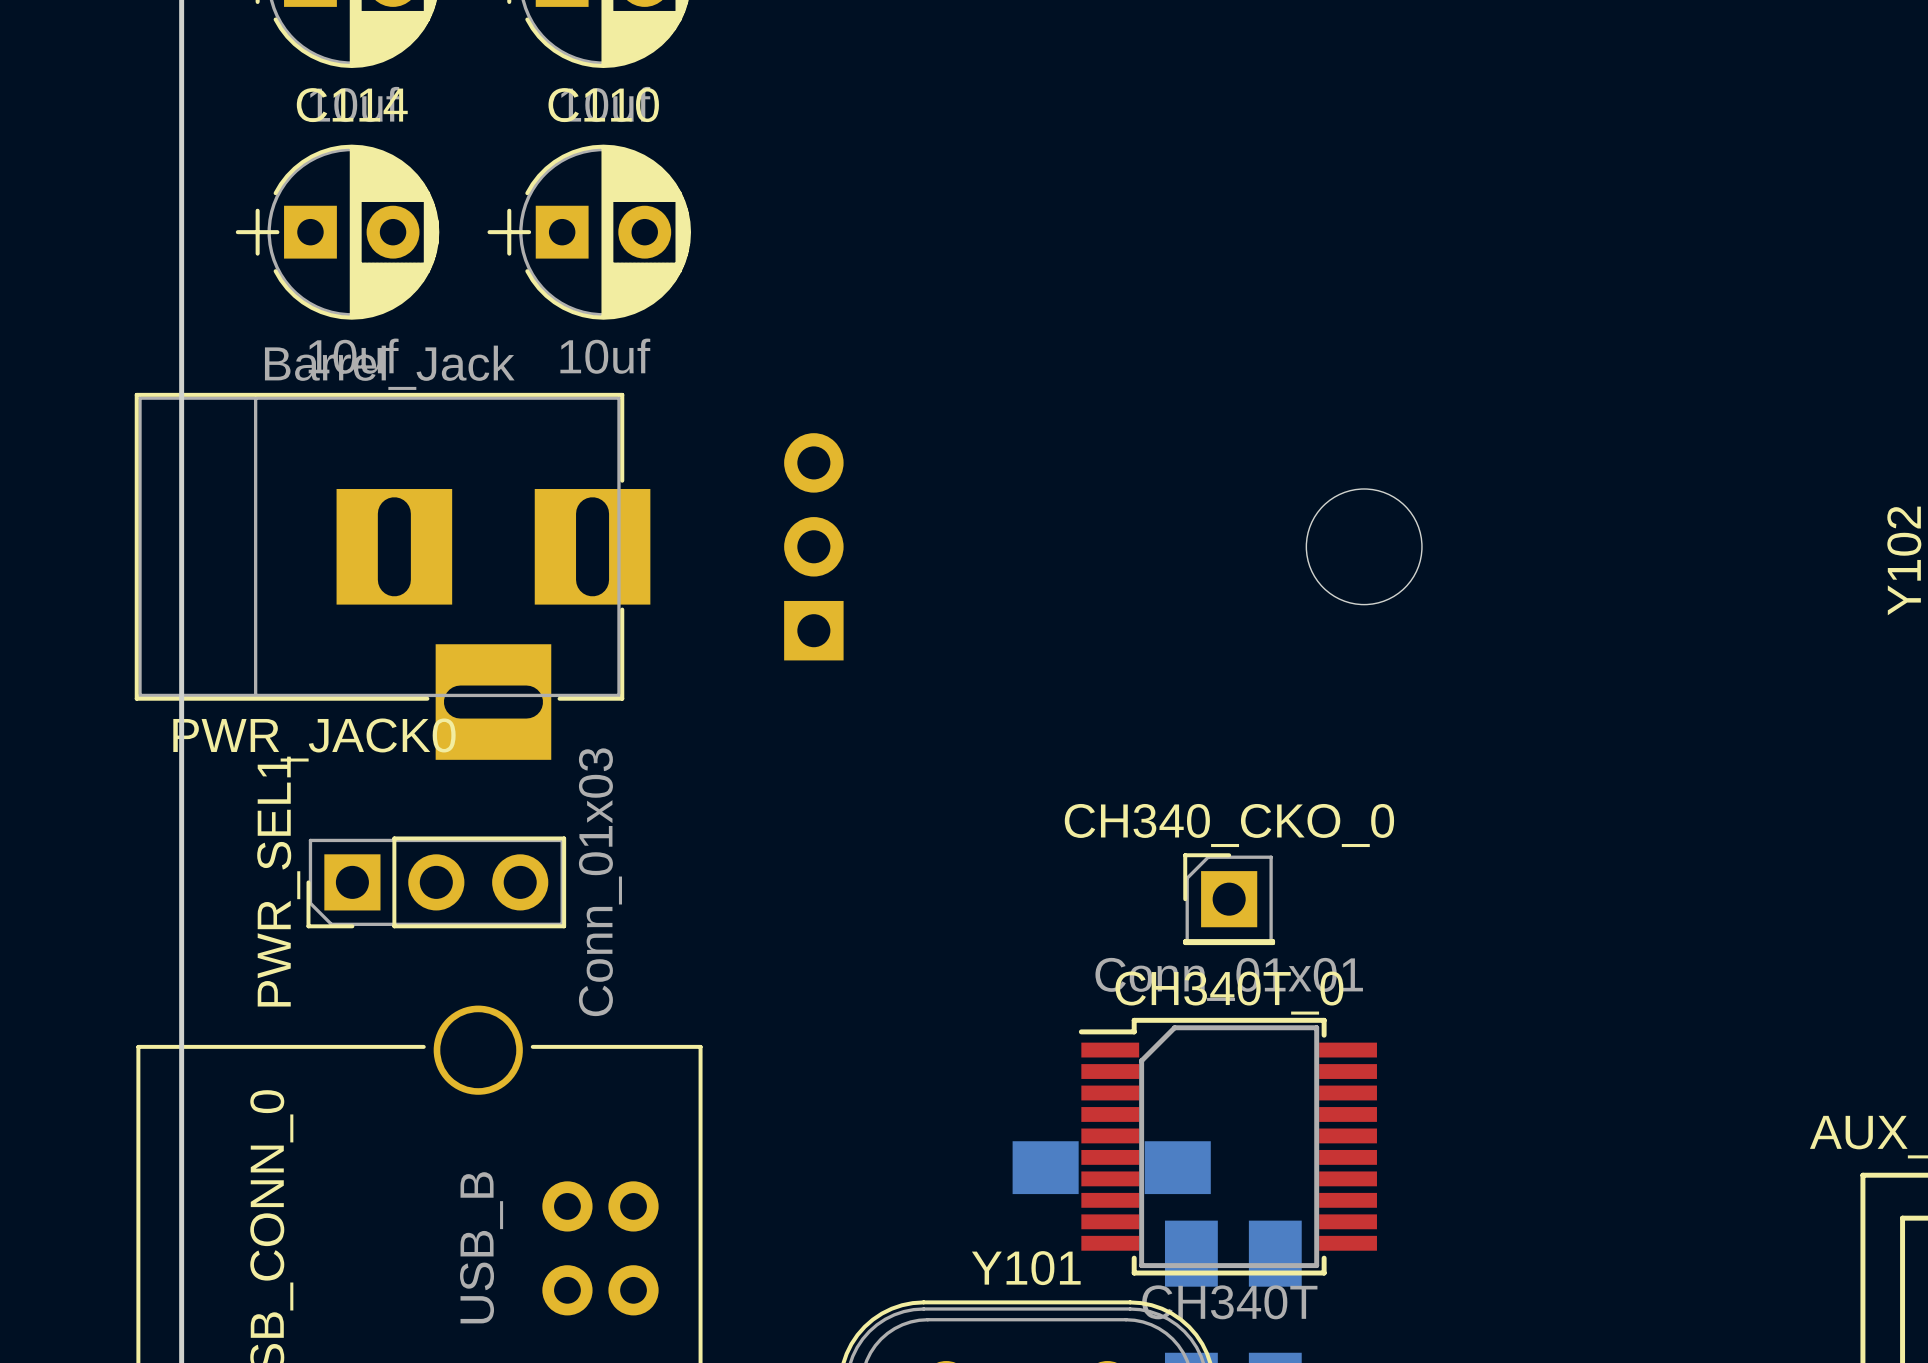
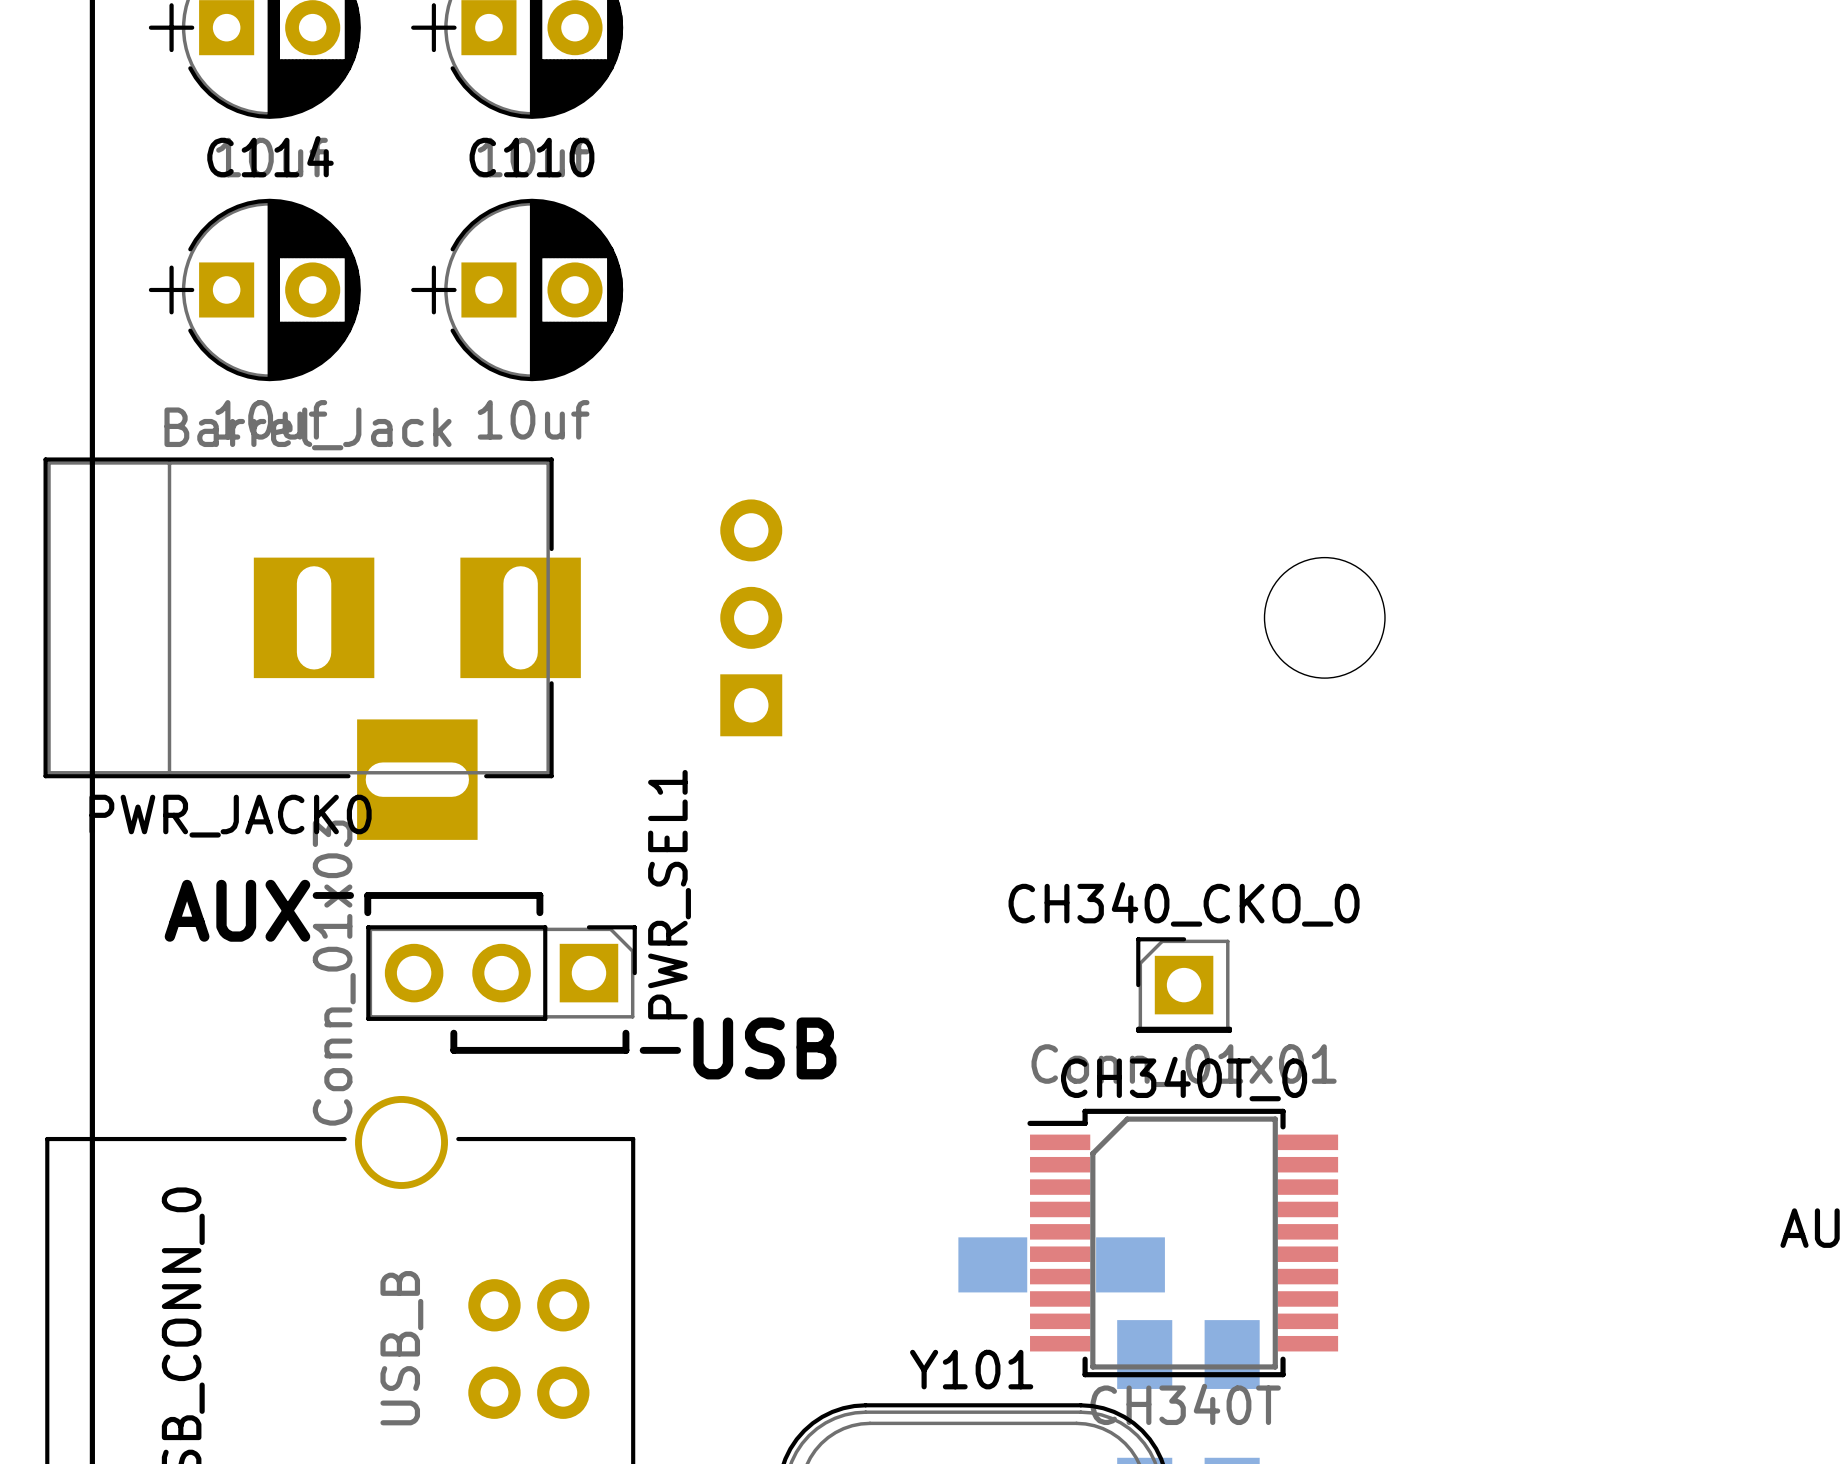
line: none -> (316, 895) (350, 895)
text: none -> AUX (237, 910)
line: none -> (367, 912) (367, 895) (539, 895) (539, 912)
PWR_SEL1 name position: PWR_SEL1 (278, 881) -> PWR_SEL1 (669, 894)
PWR_SEL1 rotation: 0° (436, 882) -> 180° (501, 973)
line: none -> (453, 1033) (453, 1050) (625, 1050) (625, 1033)
text: none -> USB (764, 1048)
line: none -> (643, 1050) (677, 1050)

